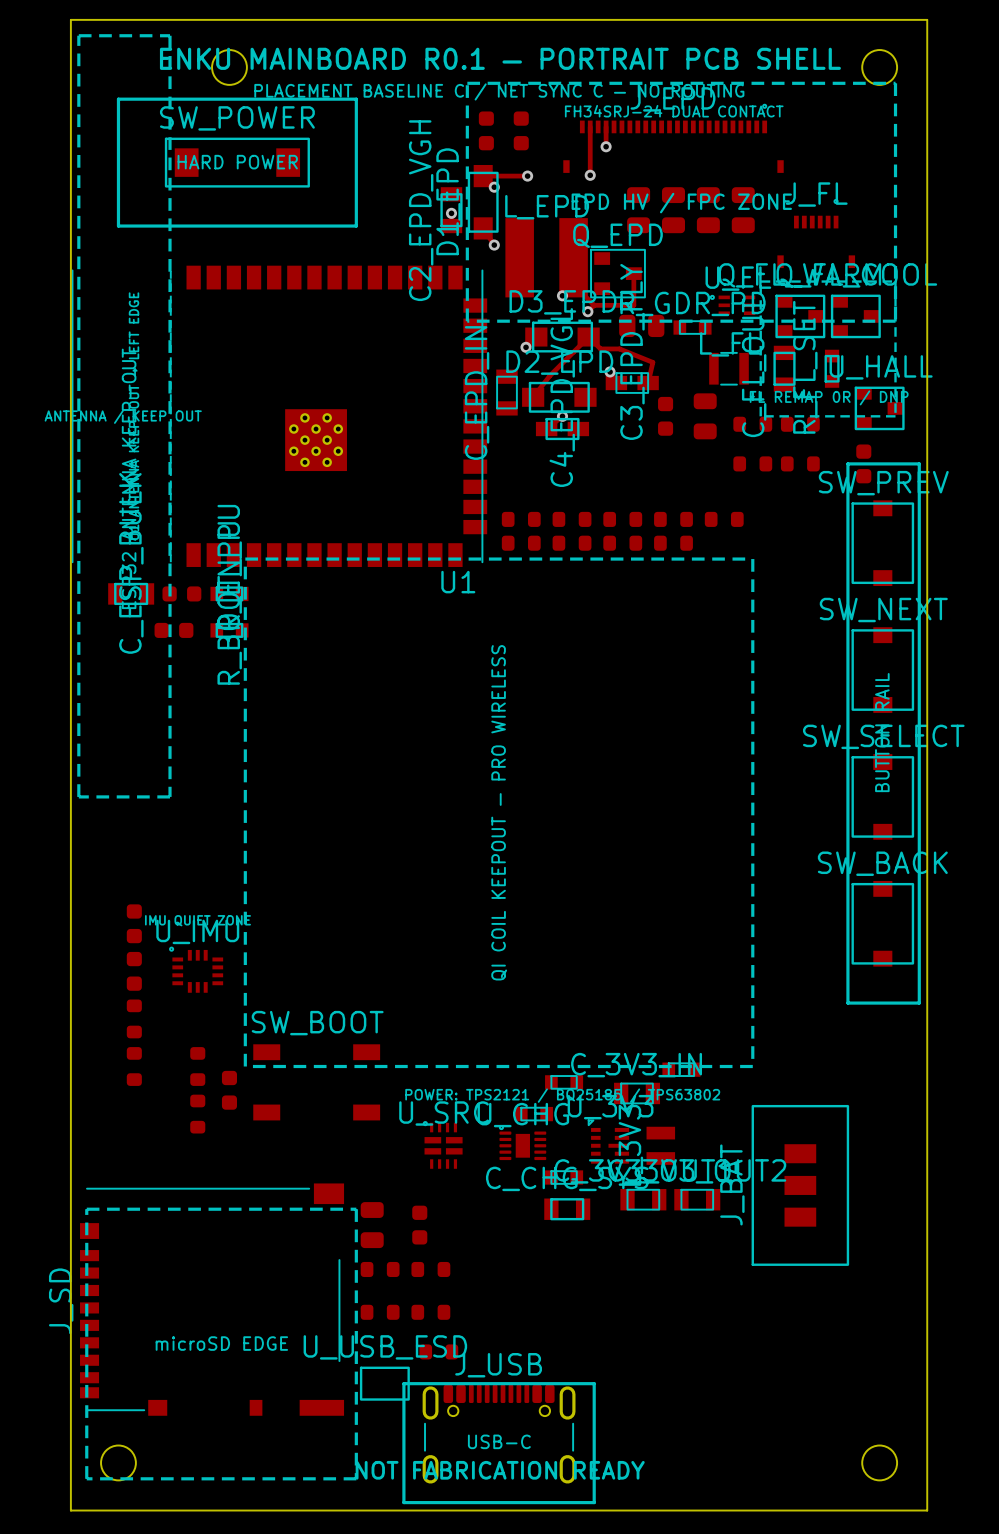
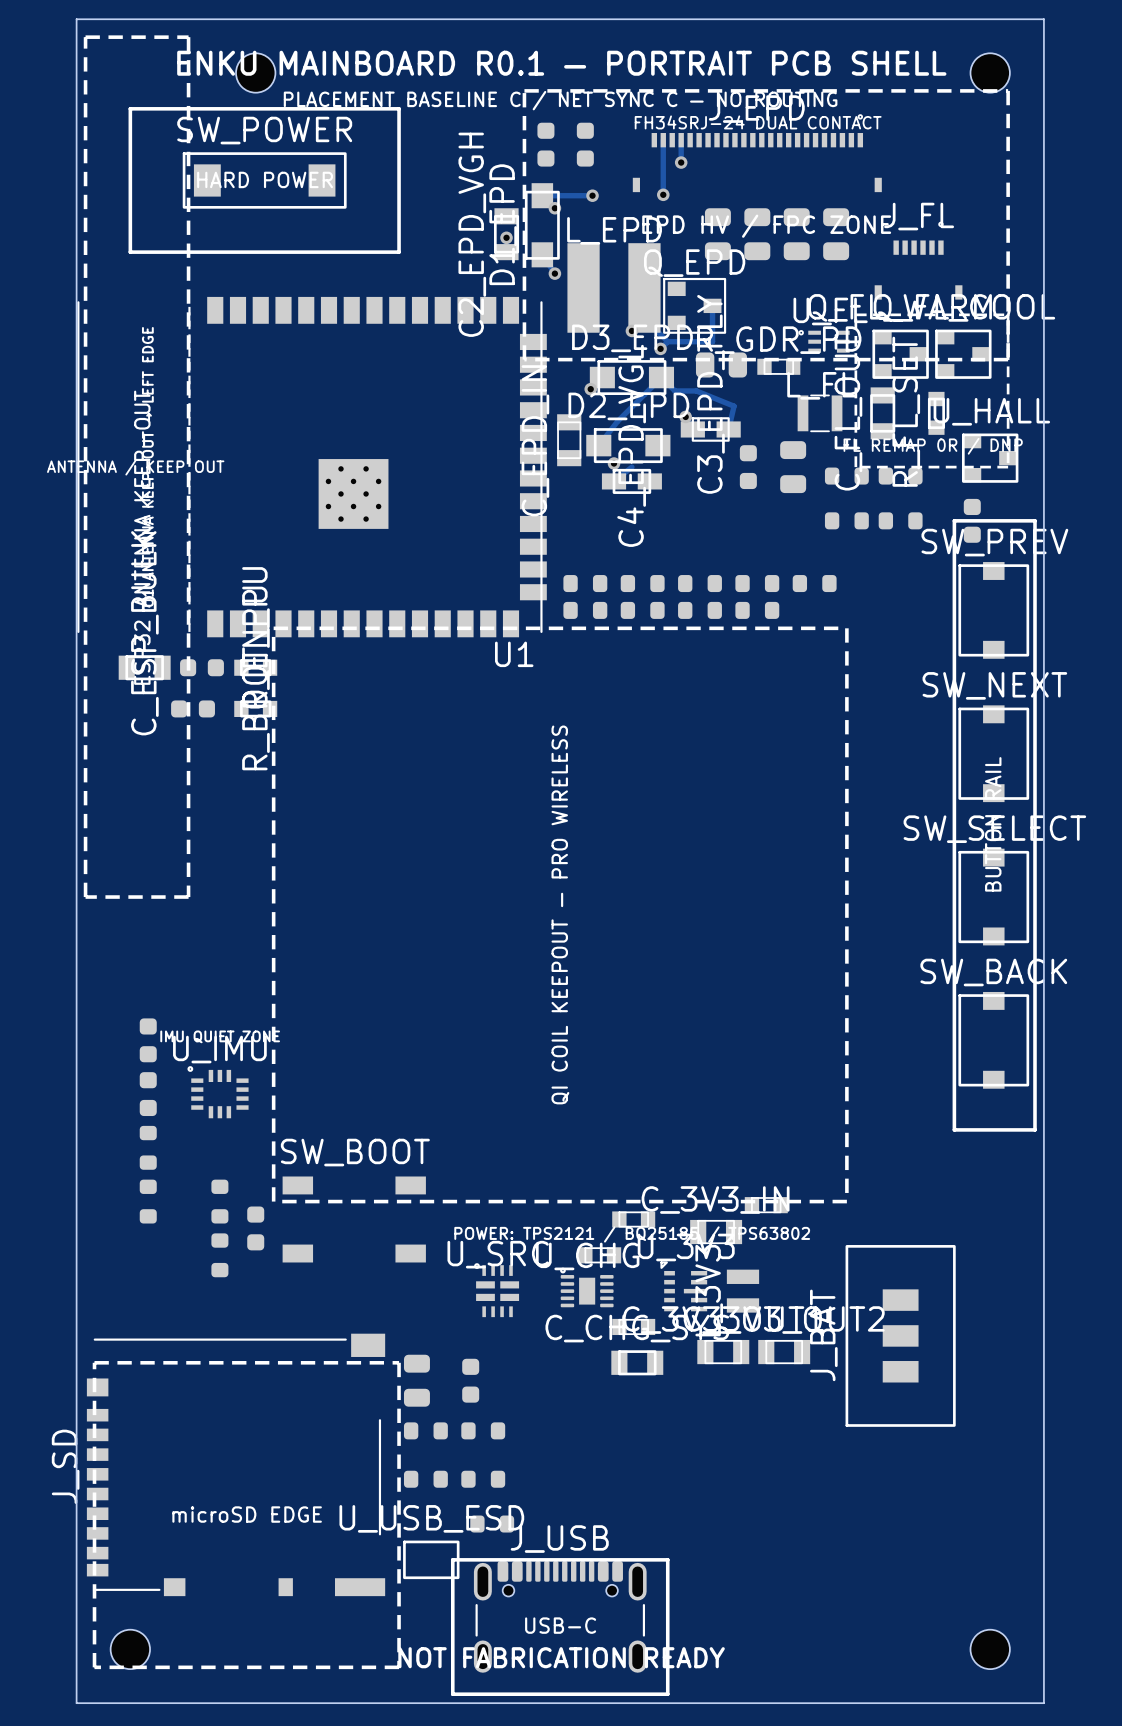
via position: (562, 416) -> (614, 463)

